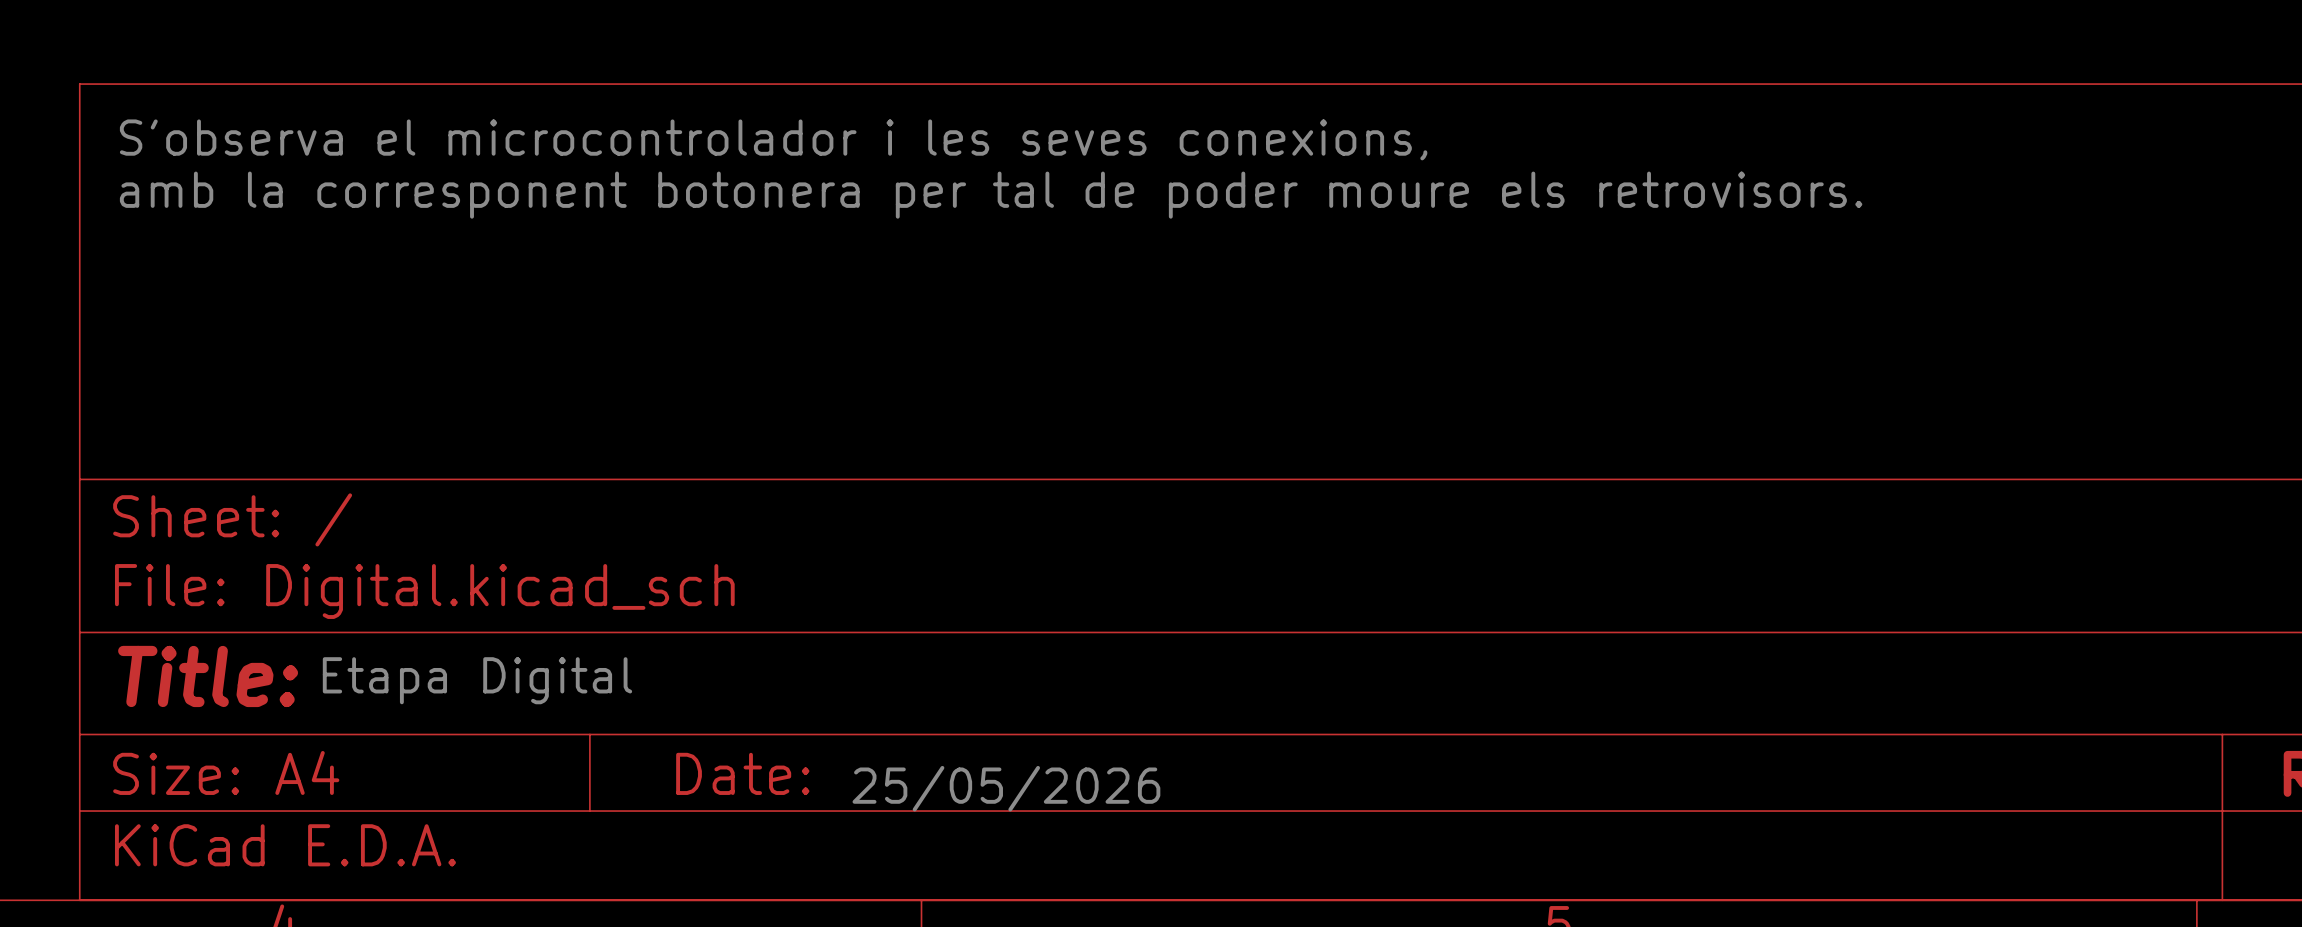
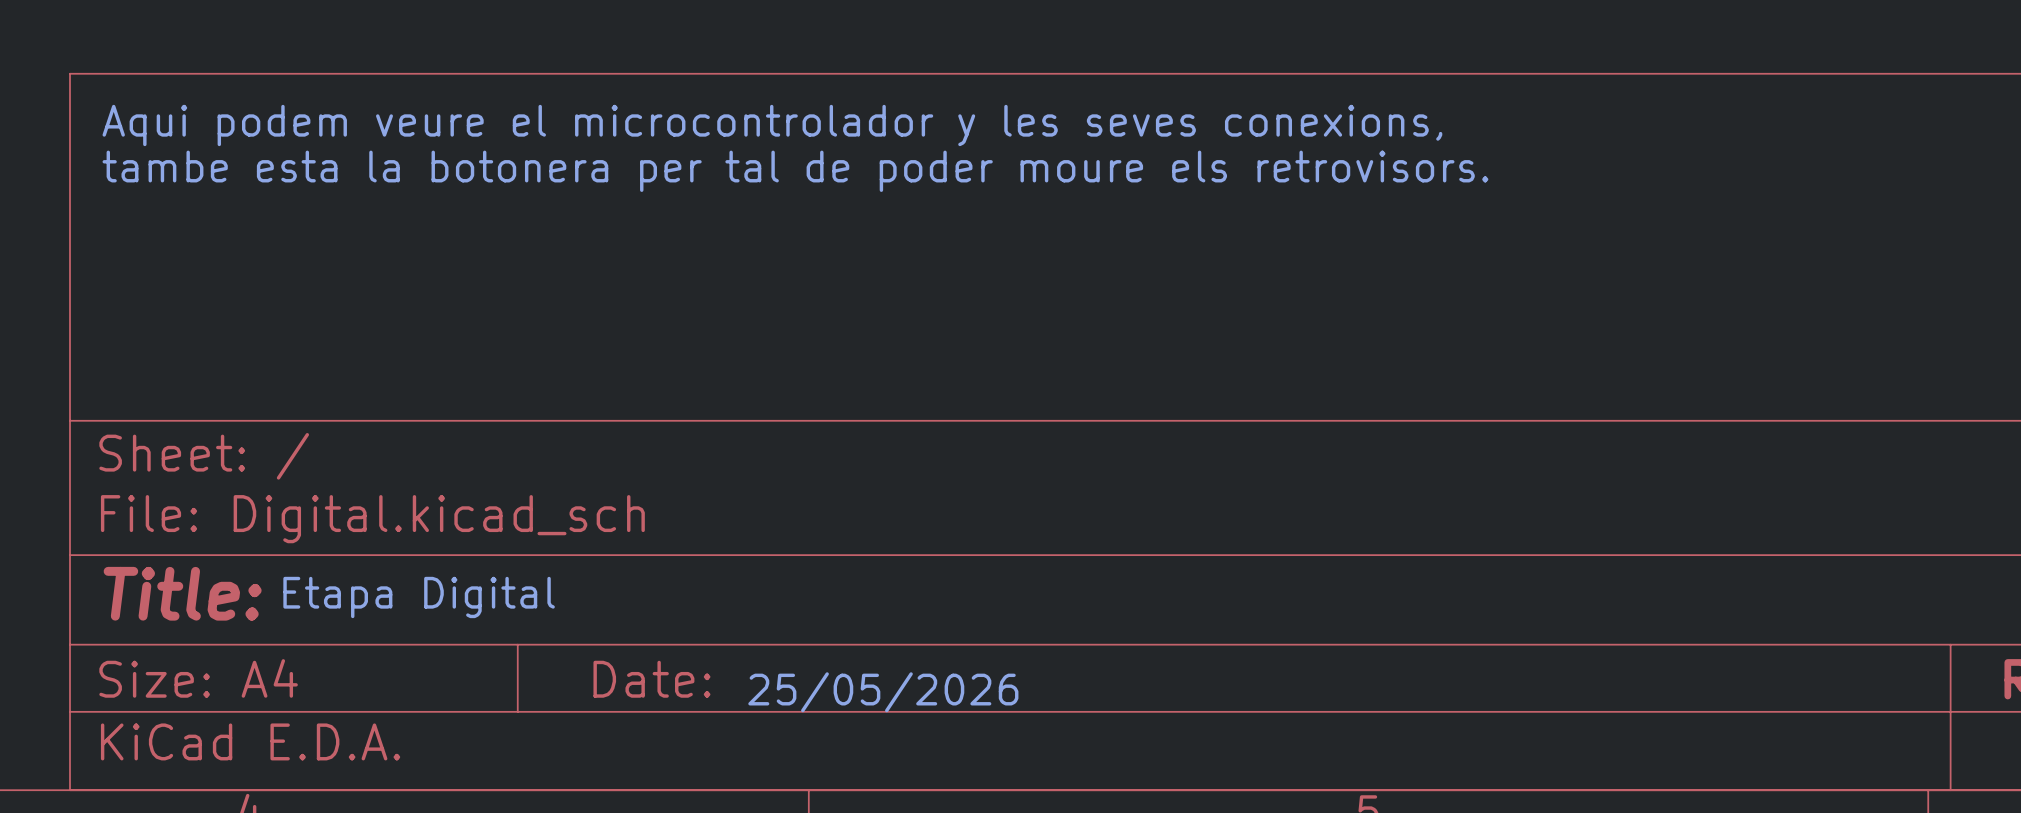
text: S'observa el microcontrolador i les seves conexions, (773, 139) -> Aqui podem veure el microcontrolador y les seves conexions, (772, 125)
text: amb la corresponent botonera per tal de poder moure els retrovisors. (991, 195) -> tambe esta la botonera per tal de poder moure els retrovisors. (795, 171)

